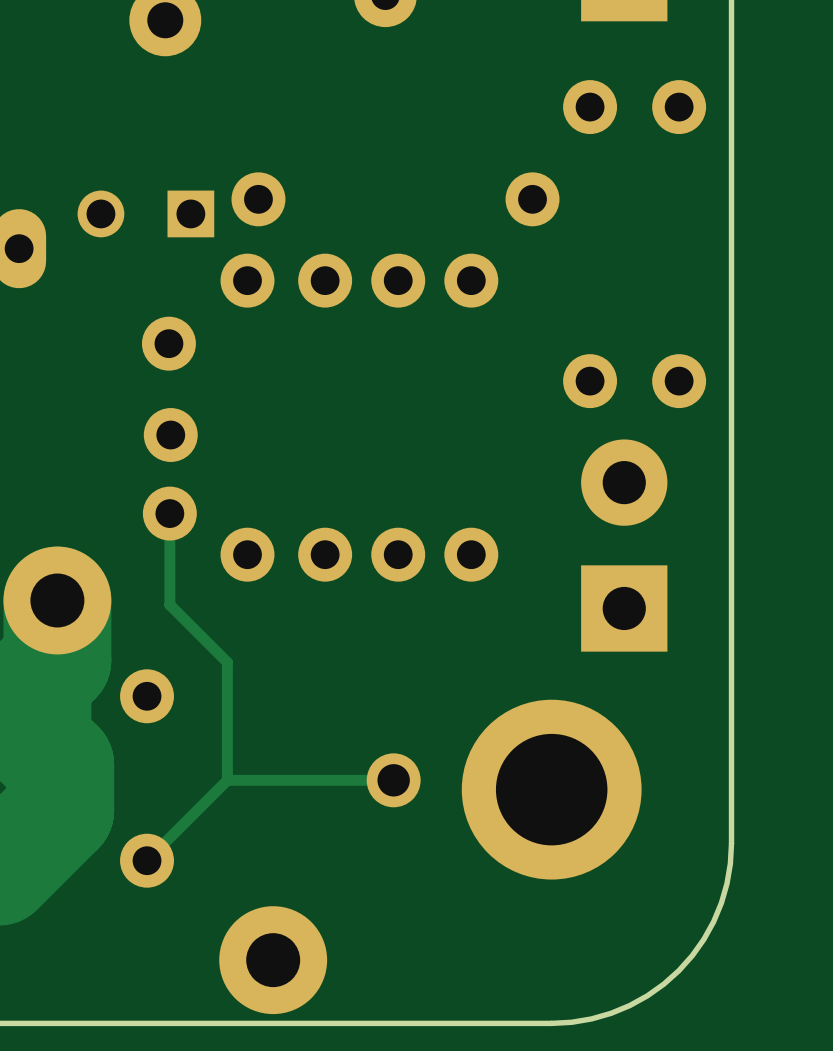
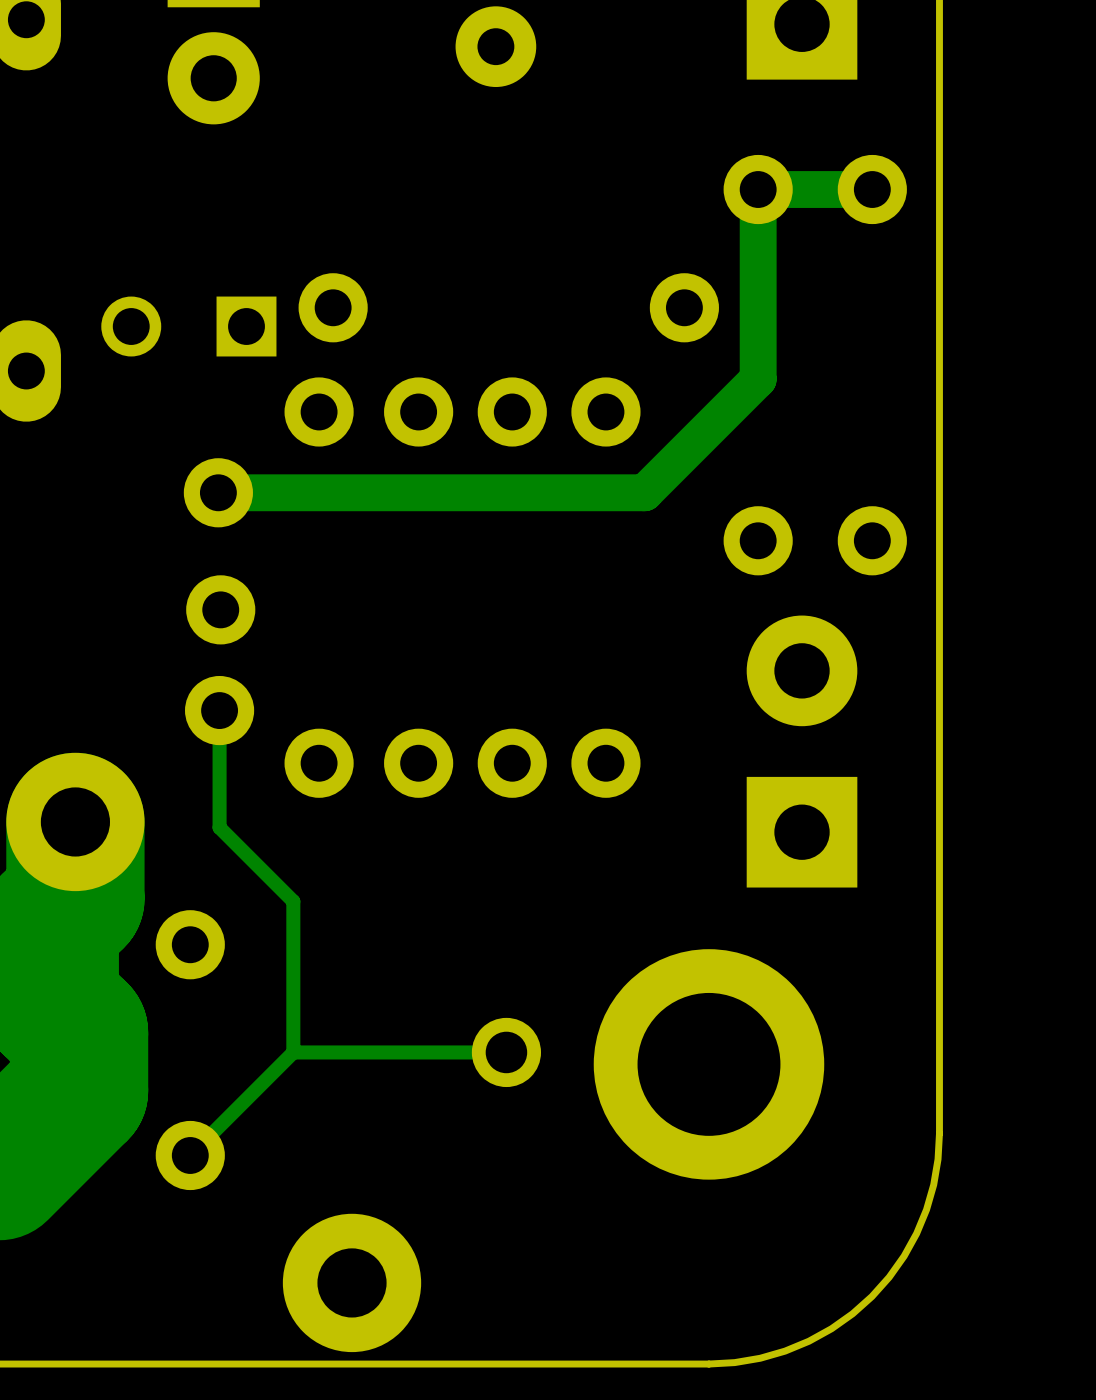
track: none -> (872, 189) (758, 189) (758, 379) (644, 492) (218, 492)

